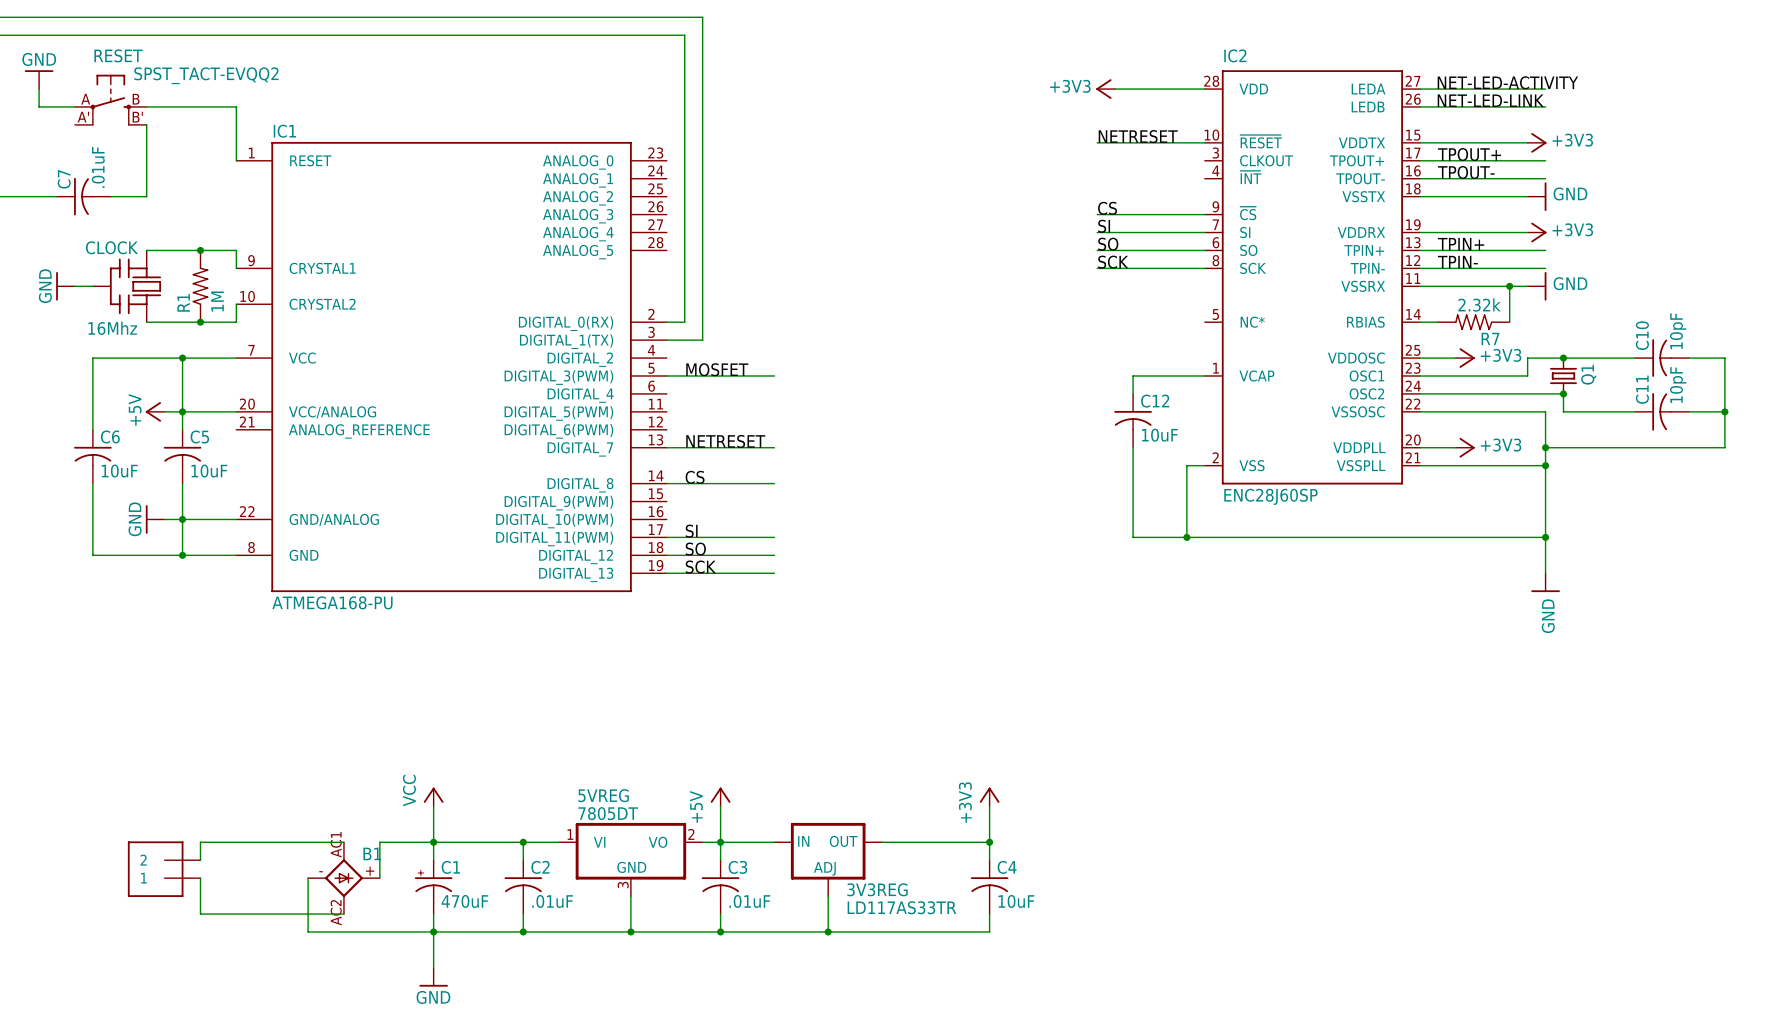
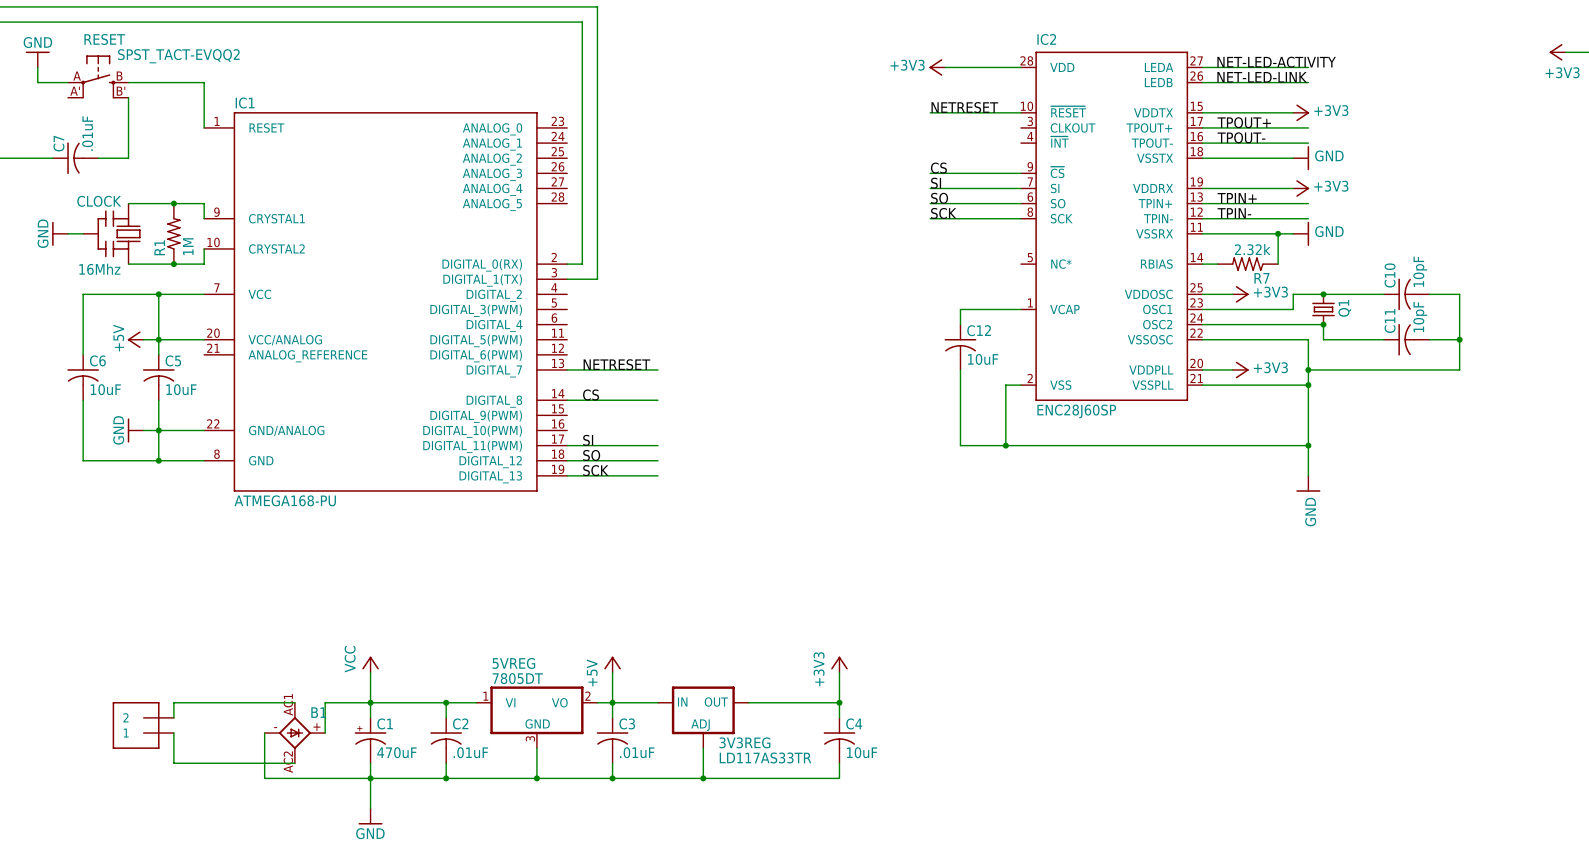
label: MOSFET (717, 369) -> none
wire: (666, 375) (774, 375) -> none

